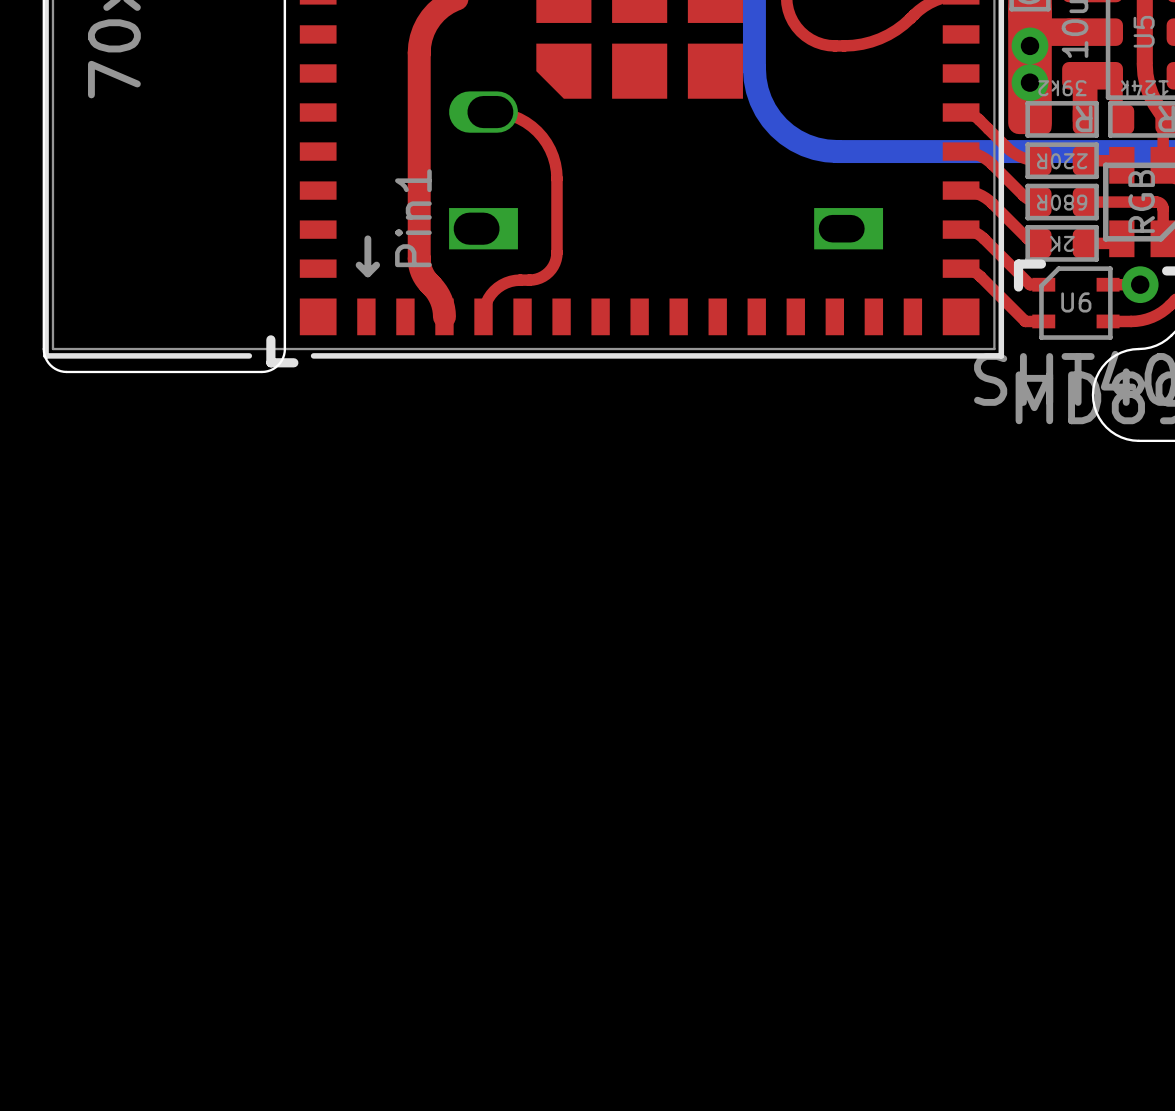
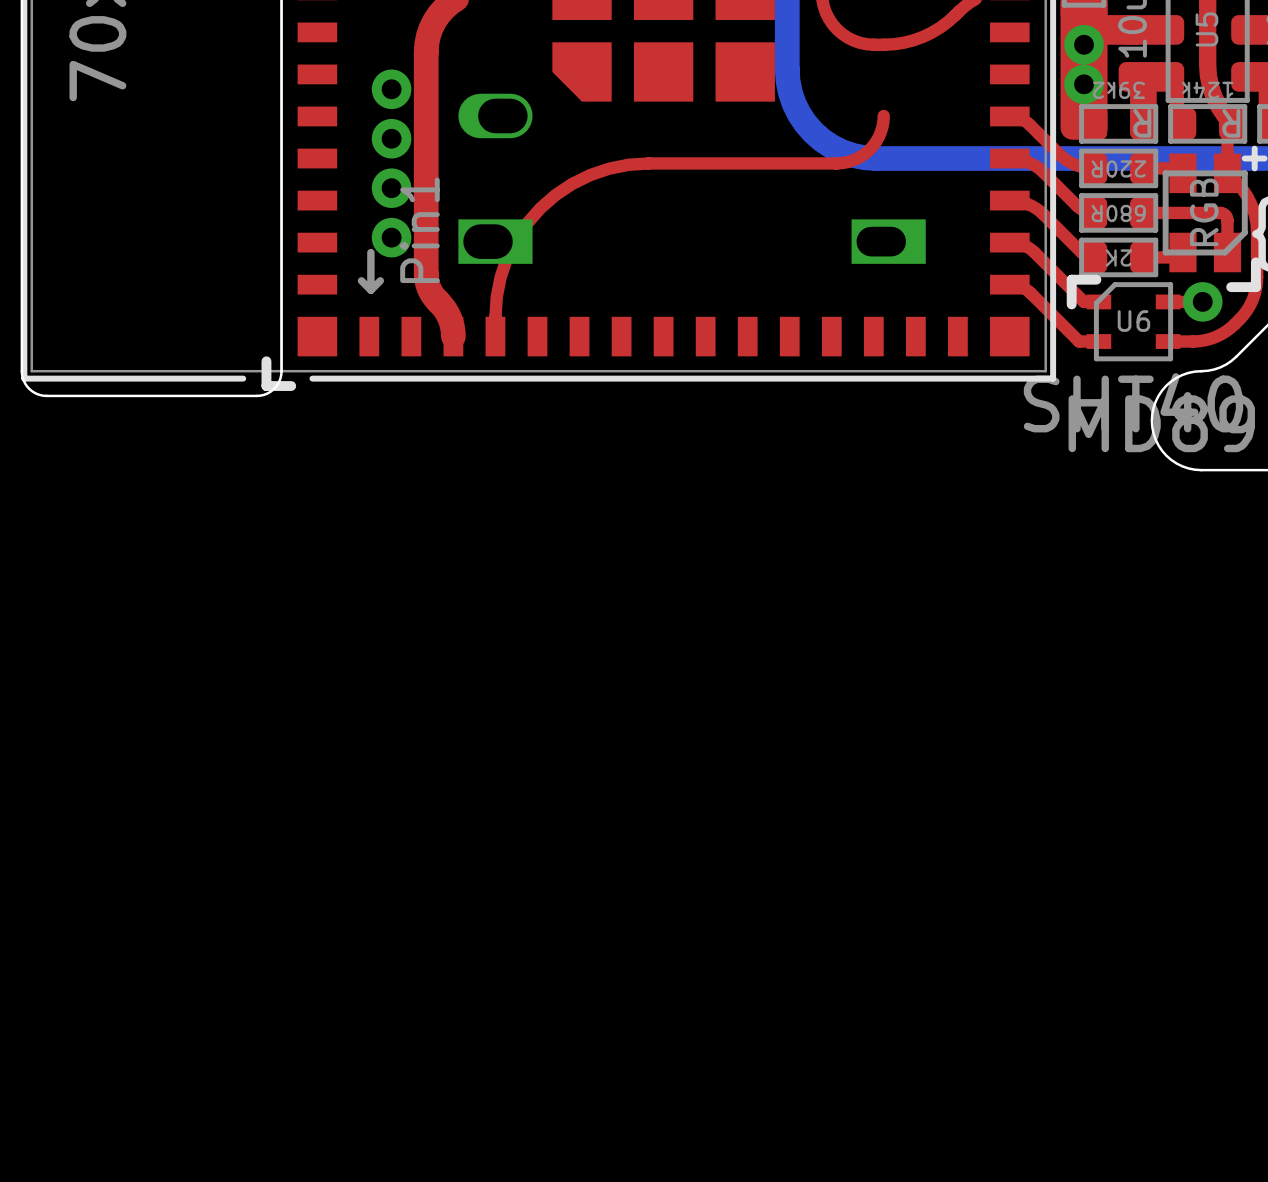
via: none -> (391, 89)
top track: (490, 112) (512, 115) (525, 122) (542, 137) (550, 149) (556, 171) (556, 252) (553, 266) (543, 276) (533, 279) (510, 281) (497, 287) (488, 298) (483, 316) -> (883, 115) (881, 131) (873, 145) (861, 156) (846, 162) (628, 164) (609, 168) (572, 184) (540, 208) (516, 240) (500, 277) (496, 296) (495, 336)
via: none -> (391, 138)
via: none -> (391, 188)
via: none -> (391, 237)

